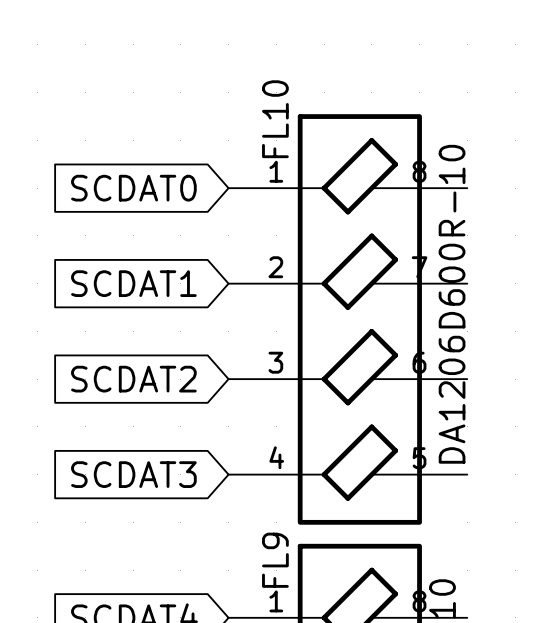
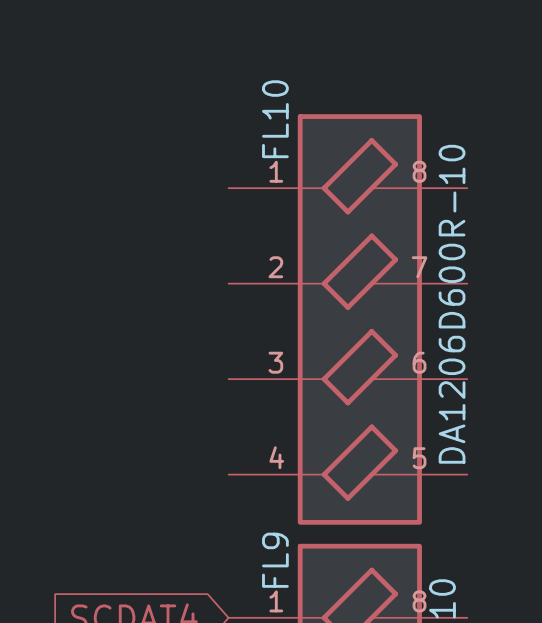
global label: SCDAT0 (133, 188) -> none
global label: SCDAT1 (133, 283) -> none
global label: SCDAT2 (133, 379) -> none
global label: SCDAT3 (133, 474) -> none

